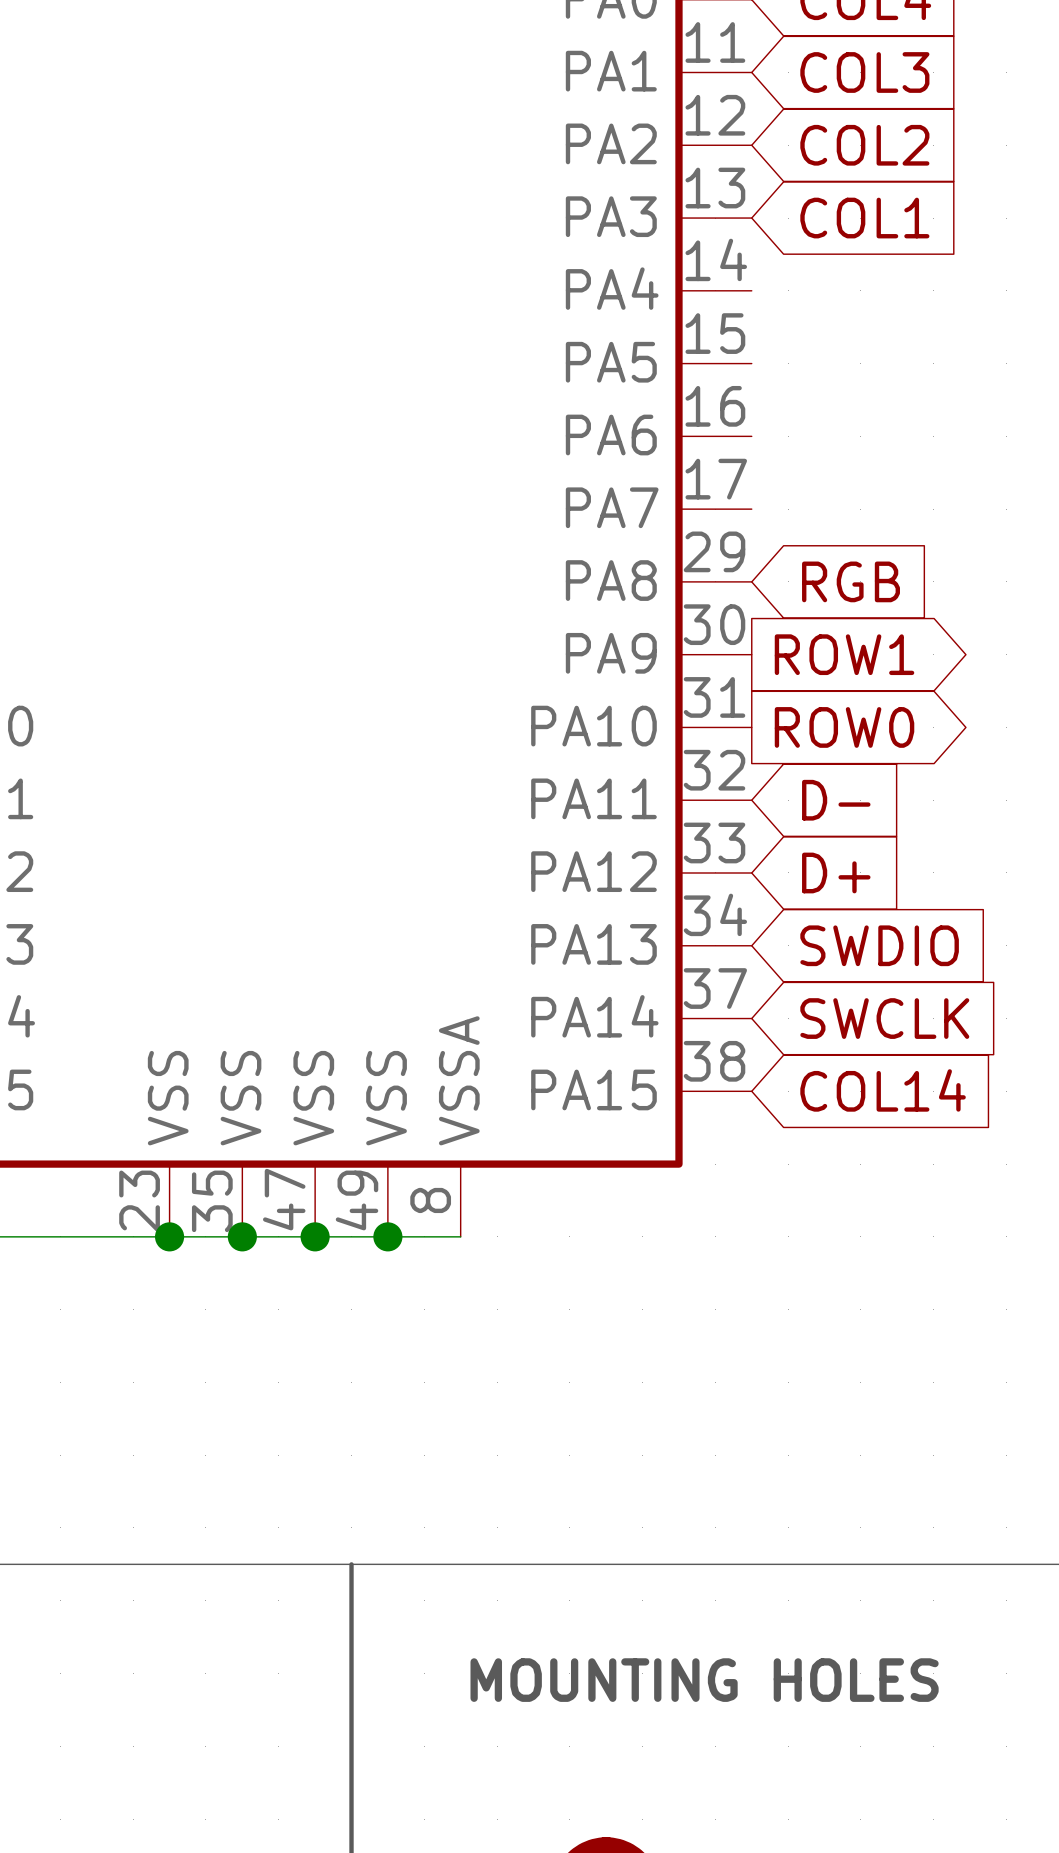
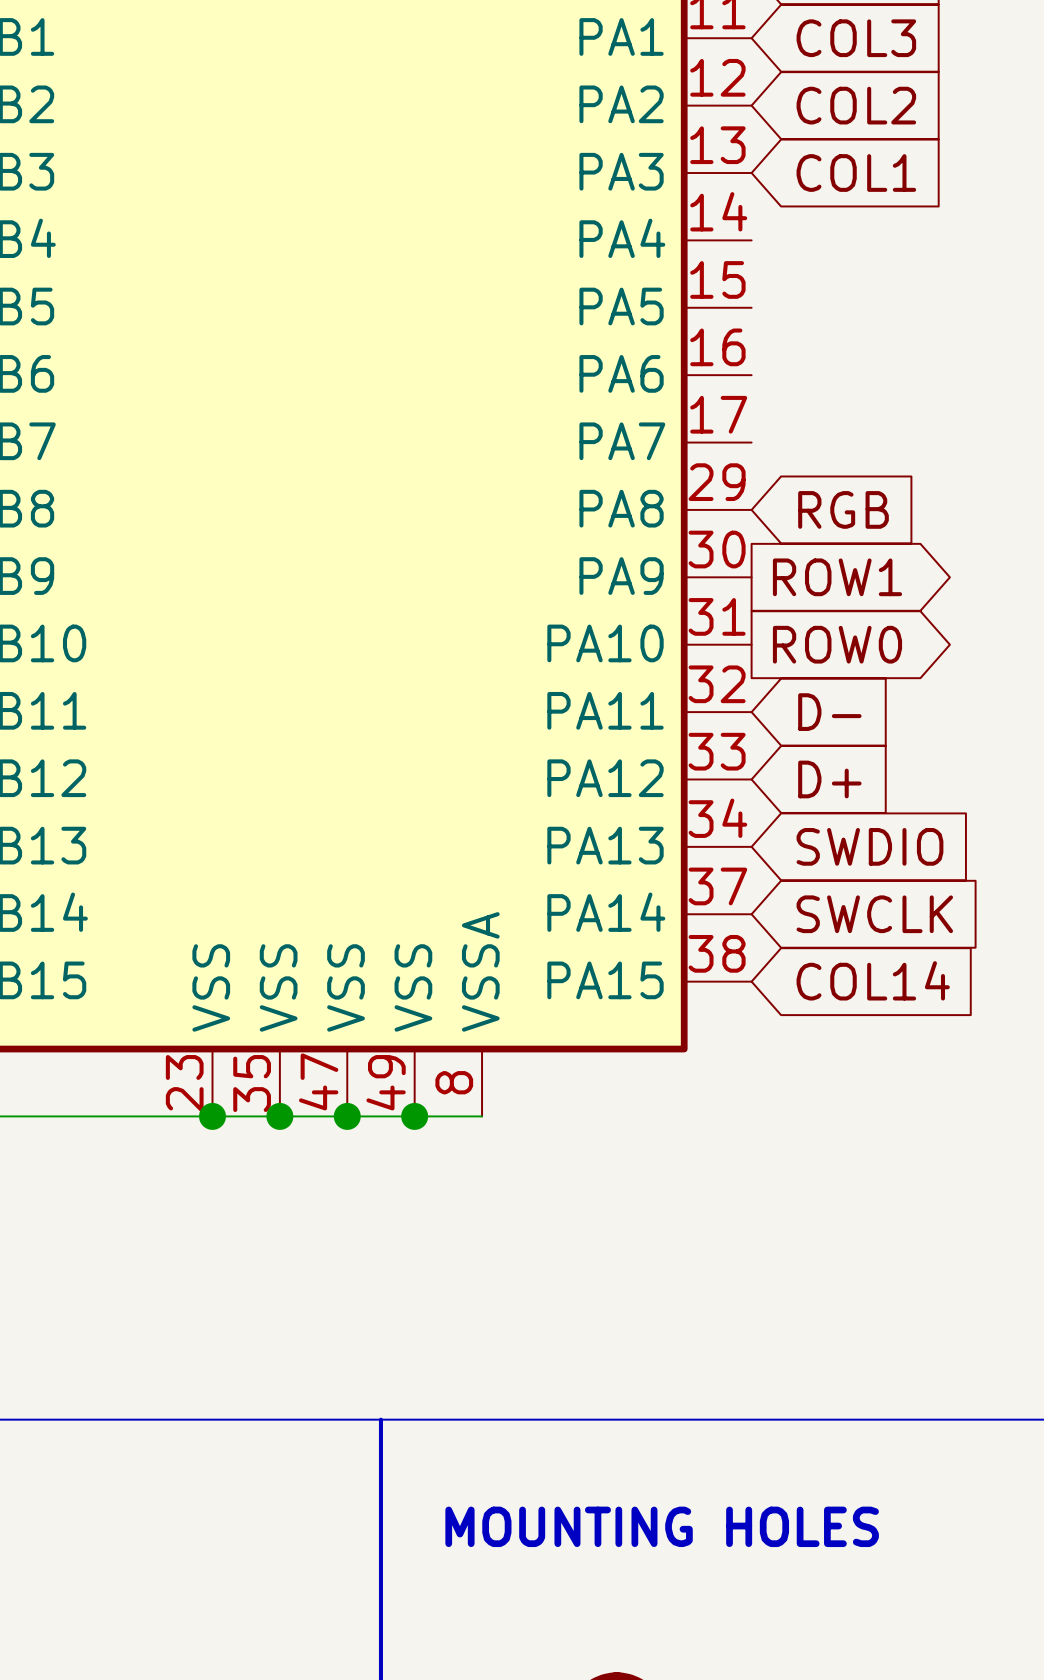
text position: MOUNTING HOLES (704, 1680) -> MOUNTING HOLES (662, 1526)

